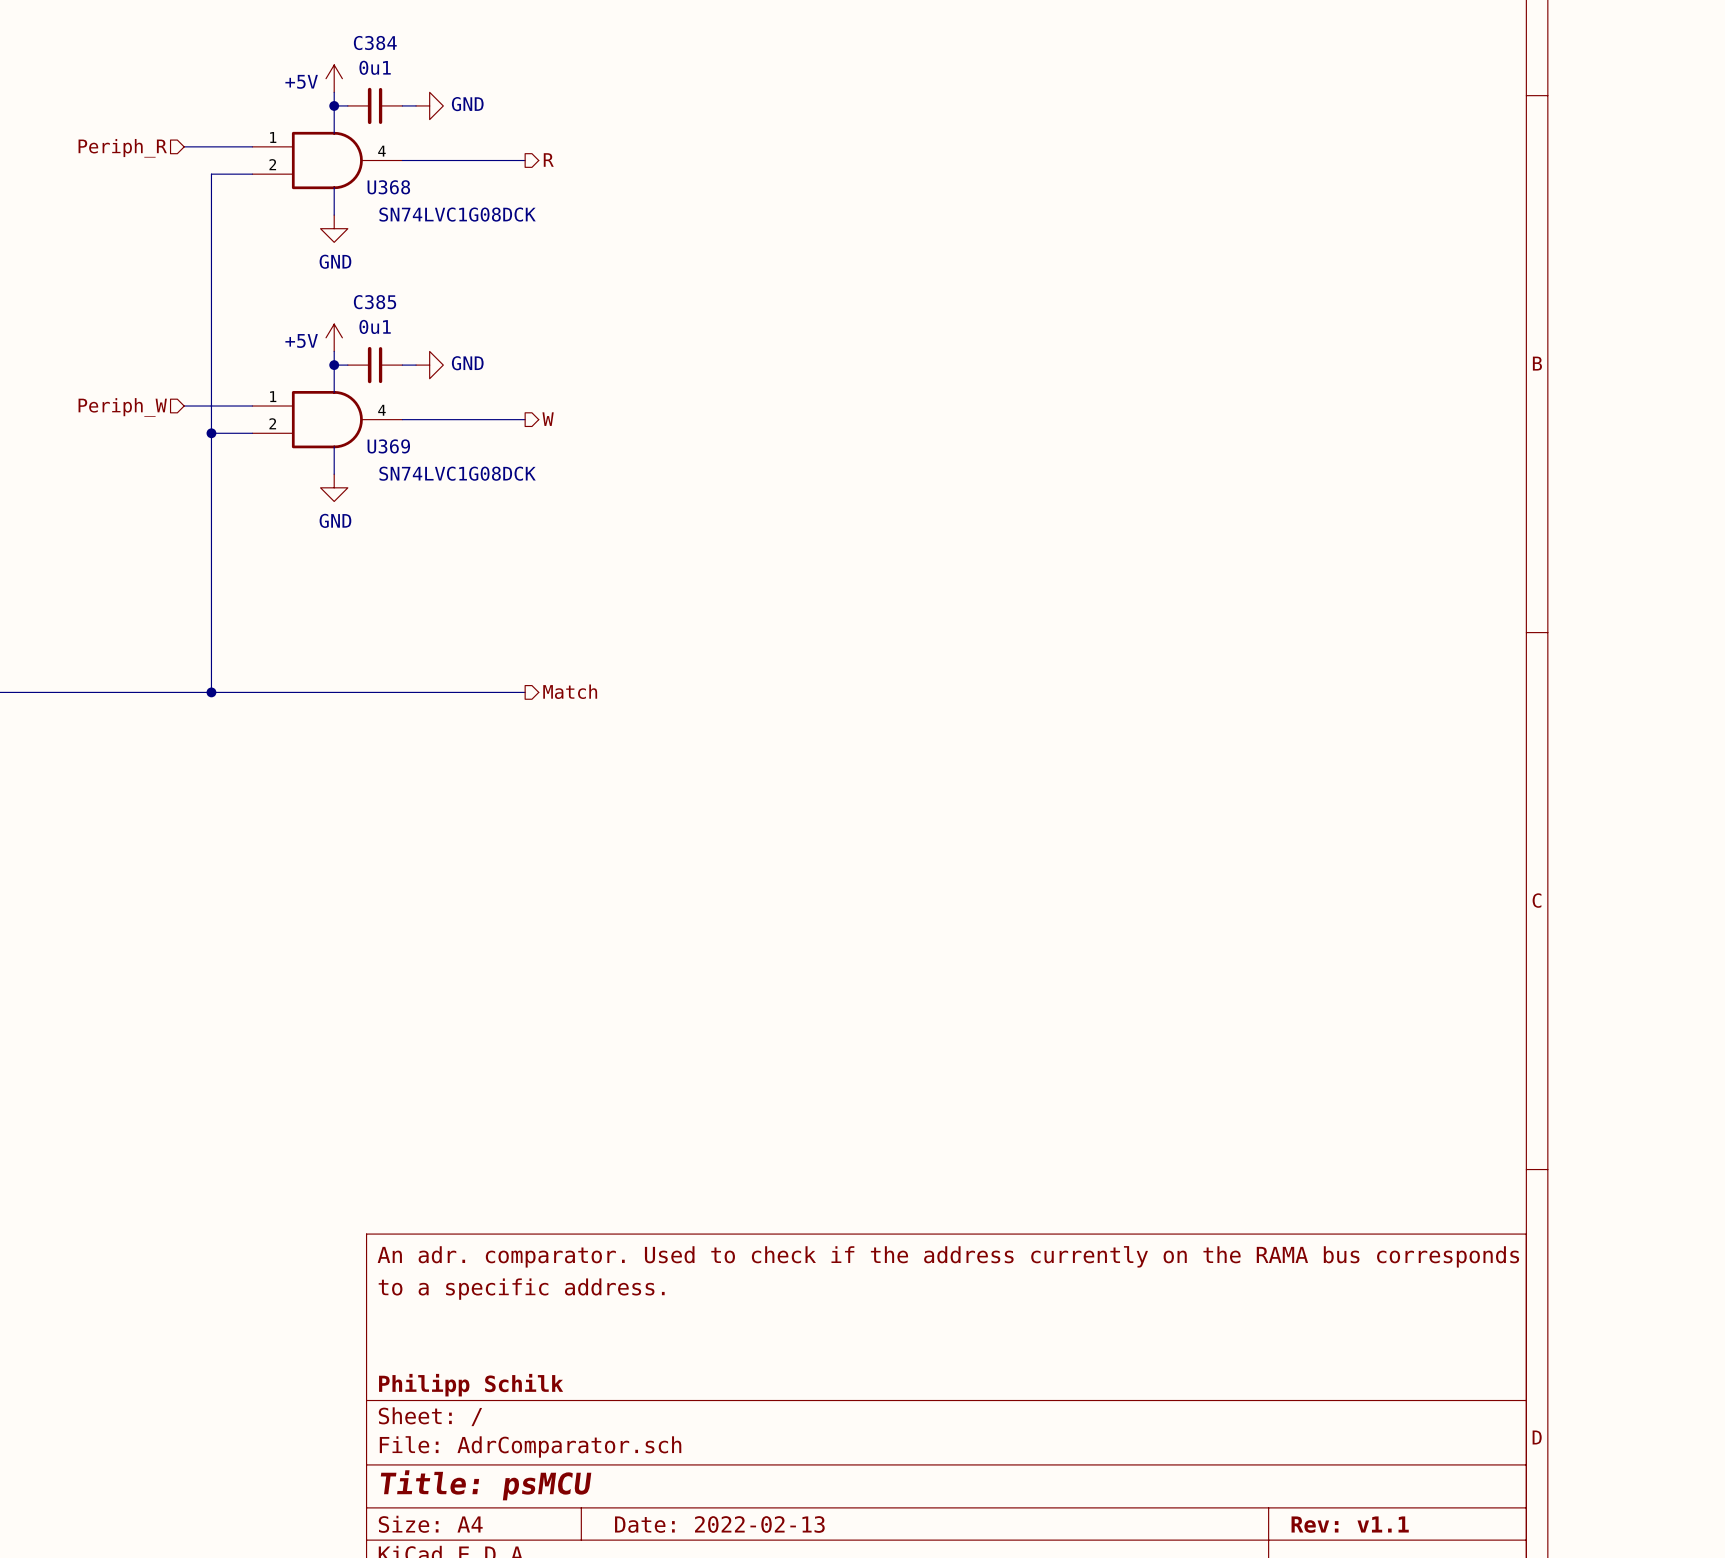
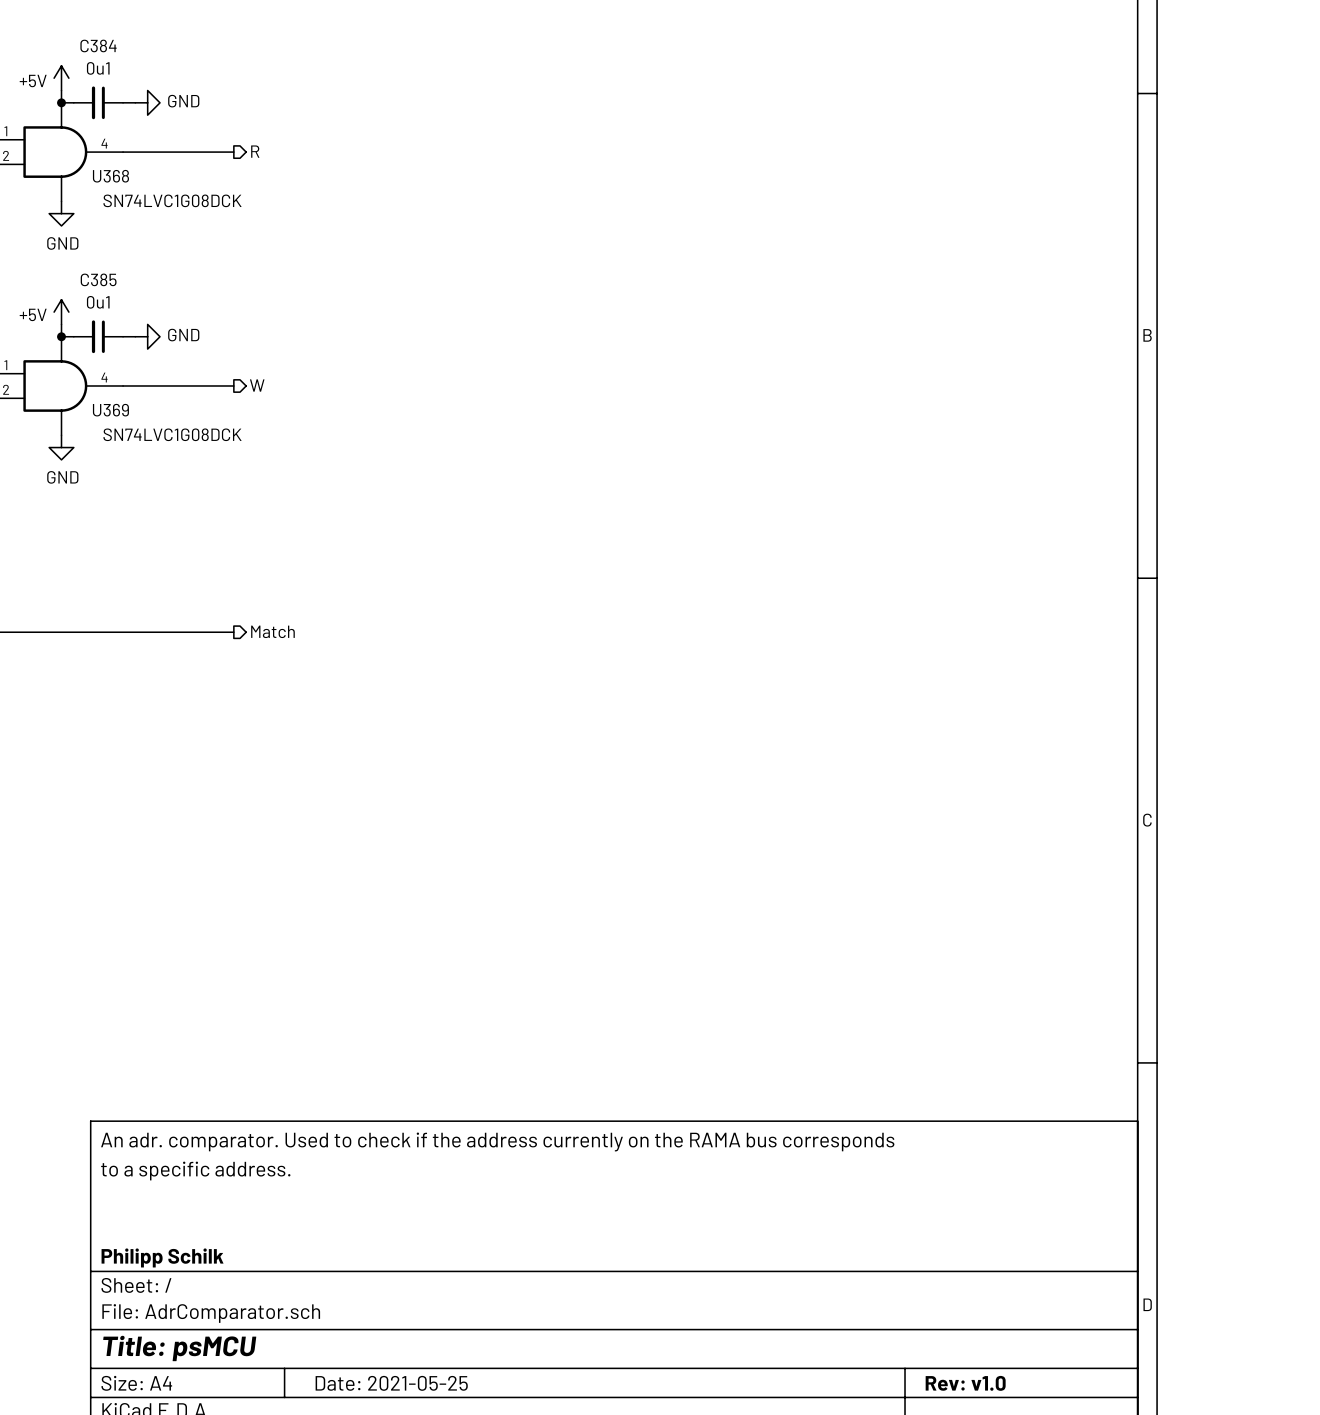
title block: Date: 2022-02-13 (719, 1524) -> Date: 2021-05-25 (391, 1383)
title block: Rev: v1.1 (1350, 1524) -> Rev: v1.0 (965, 1383)

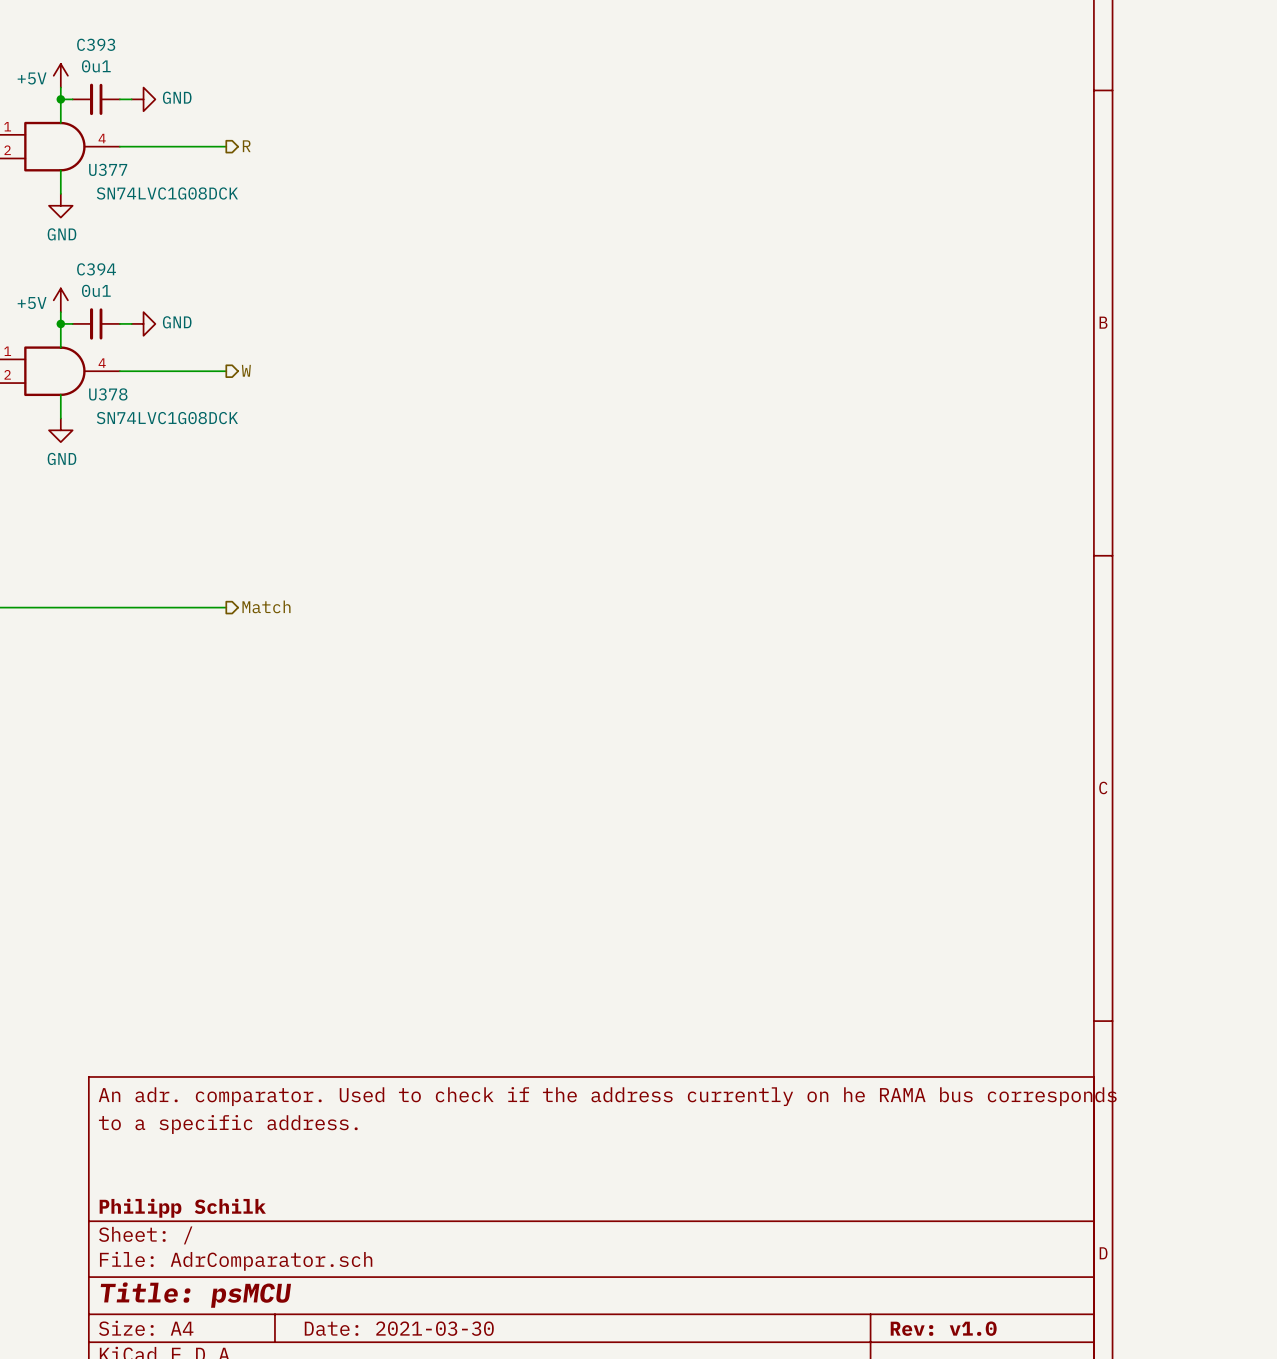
C384 name: C384 (98, 45) -> C393 (96, 44)
U368 name: U368 (110, 176) -> U377 (108, 169)
C385 name: C385 (98, 279) -> C394 (96, 269)
U369 name: U369 (110, 410) -> U378 (108, 394)
title block: An adr. comparator. Used to check if the address currently on the RAMA bus corresponds (497, 1141) -> An adr. comparator. Used to check if the address currently on he RAMA bus corresponds (607, 1096)
title block: Date: 2021-05-25 (391, 1383) -> Date: 2021-03-30 (399, 1328)

